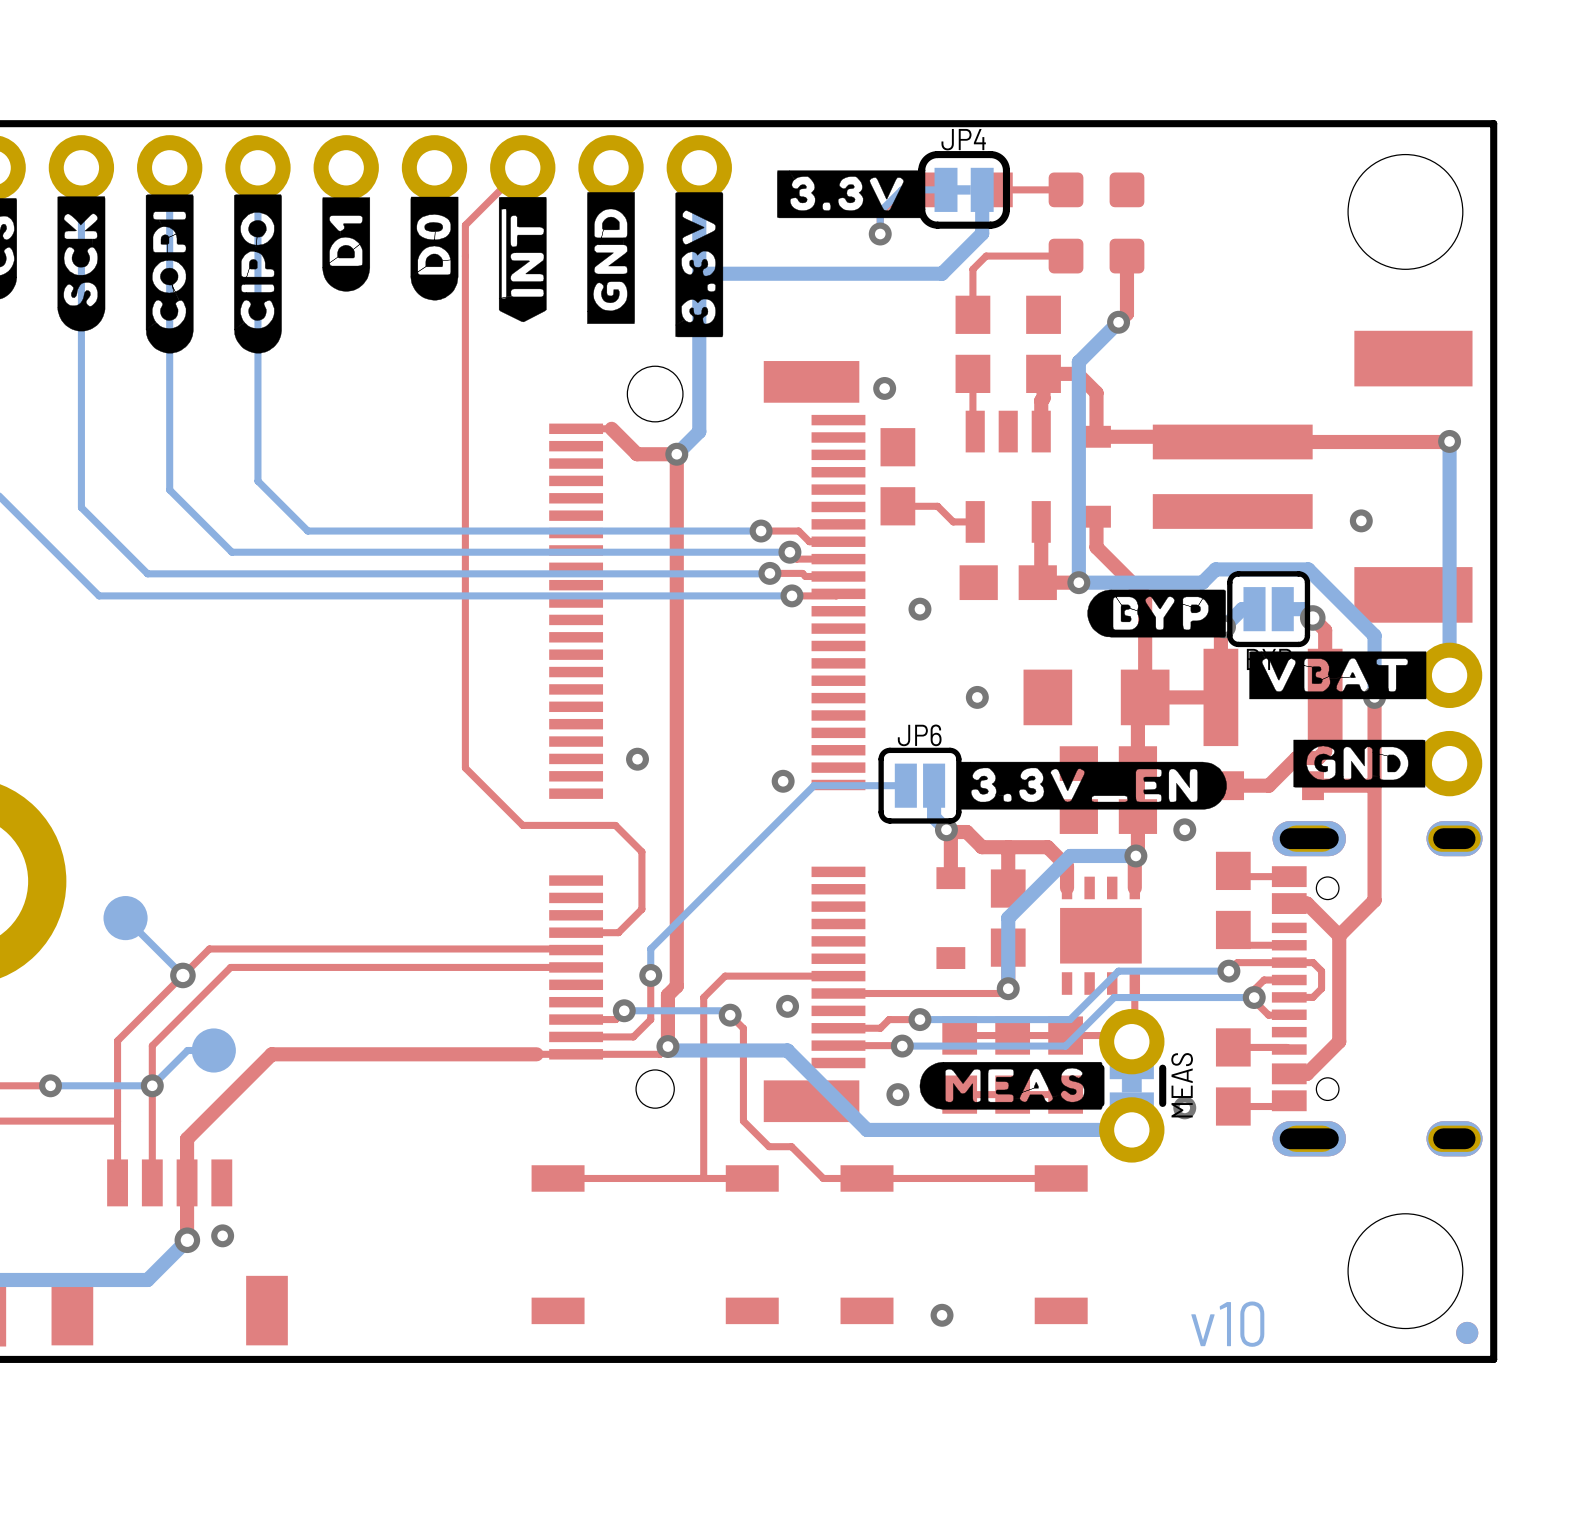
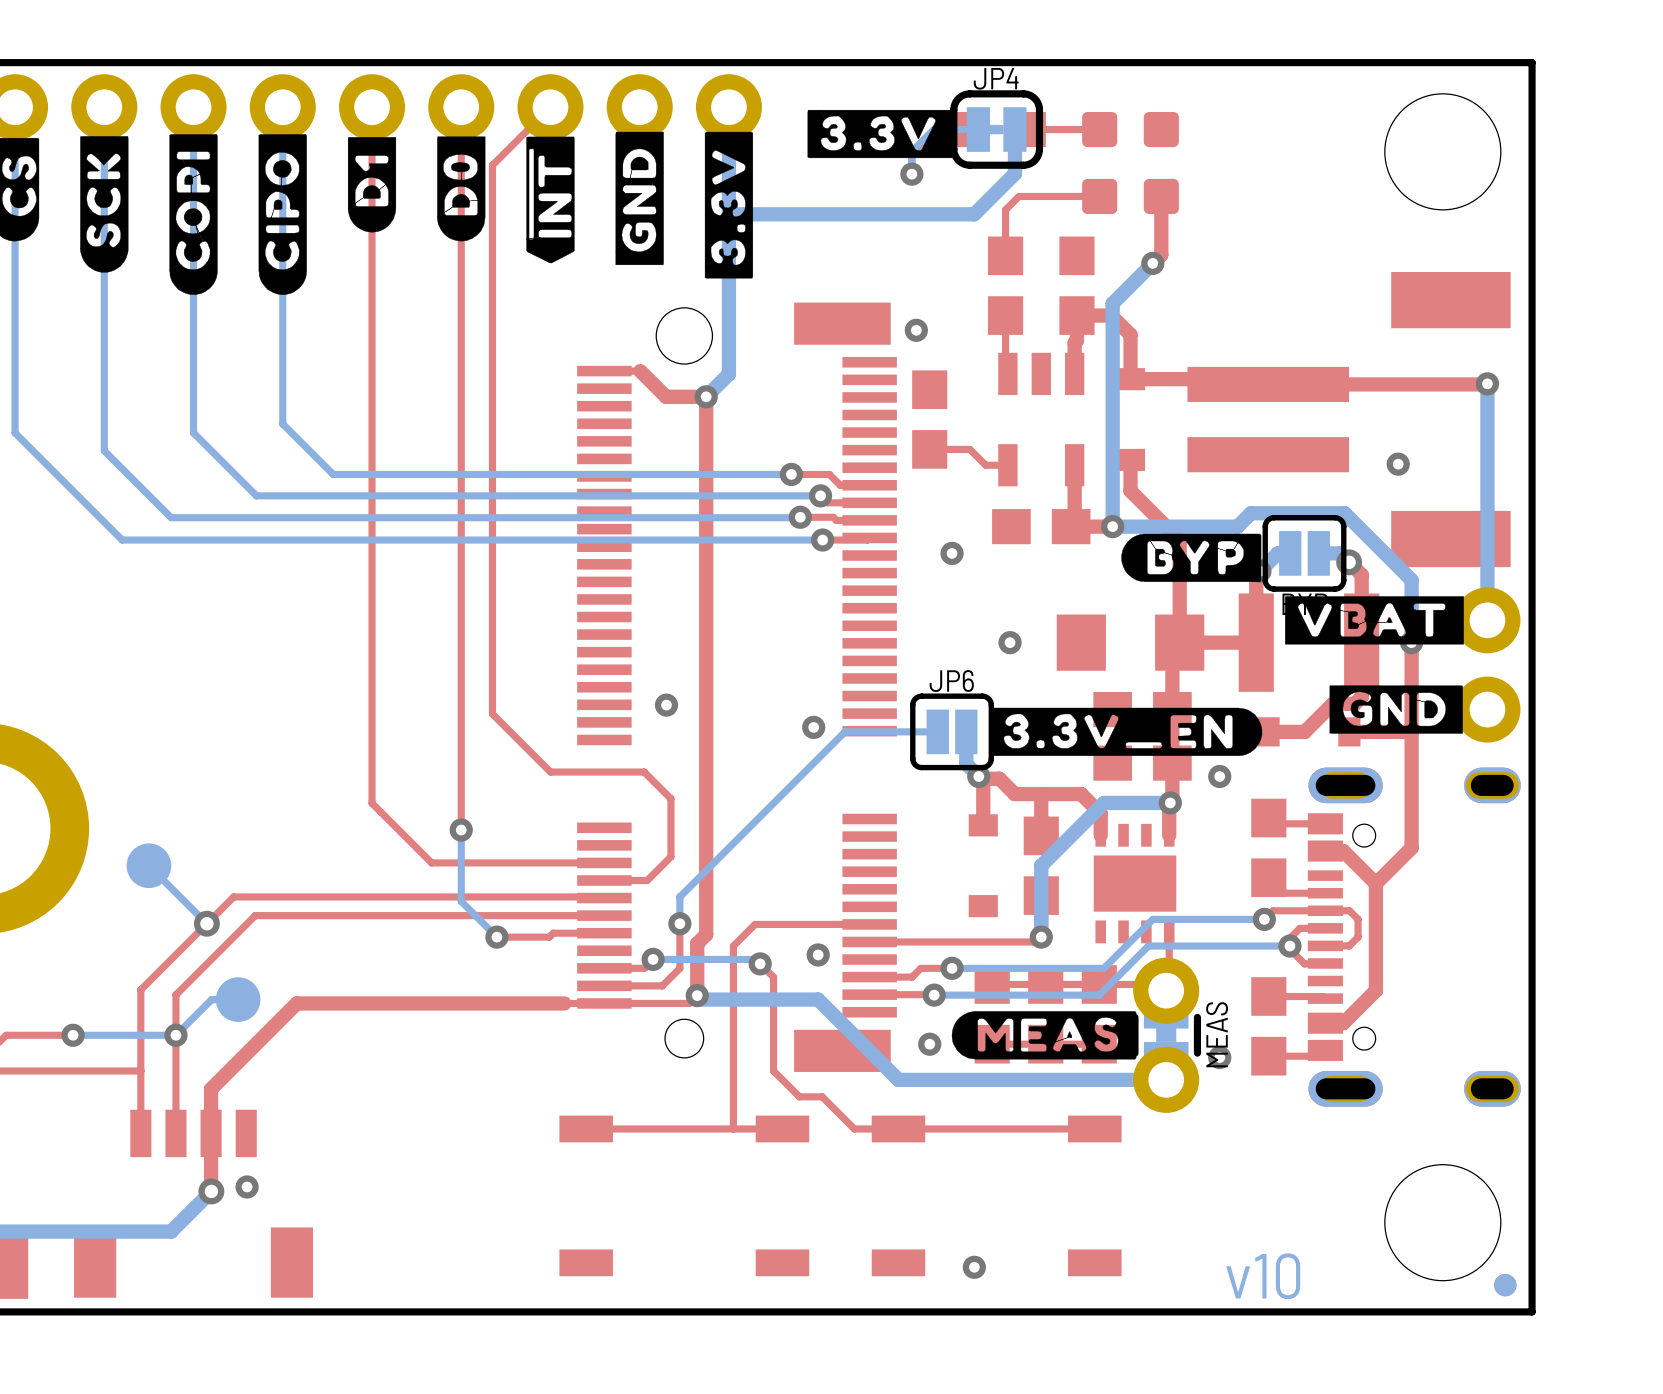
top track: none -> (372, 107) (372, 803) (431, 862) (604, 862)
top track: none -> (461, 107) (461, 830)
bottom track: none -> (461, 830) (461, 901) (496, 937)
via: none -> (461, 830)
top track: none -> (604, 933) (553, 933) (549, 937) (496, 937)
via: none -> (496, 937)

